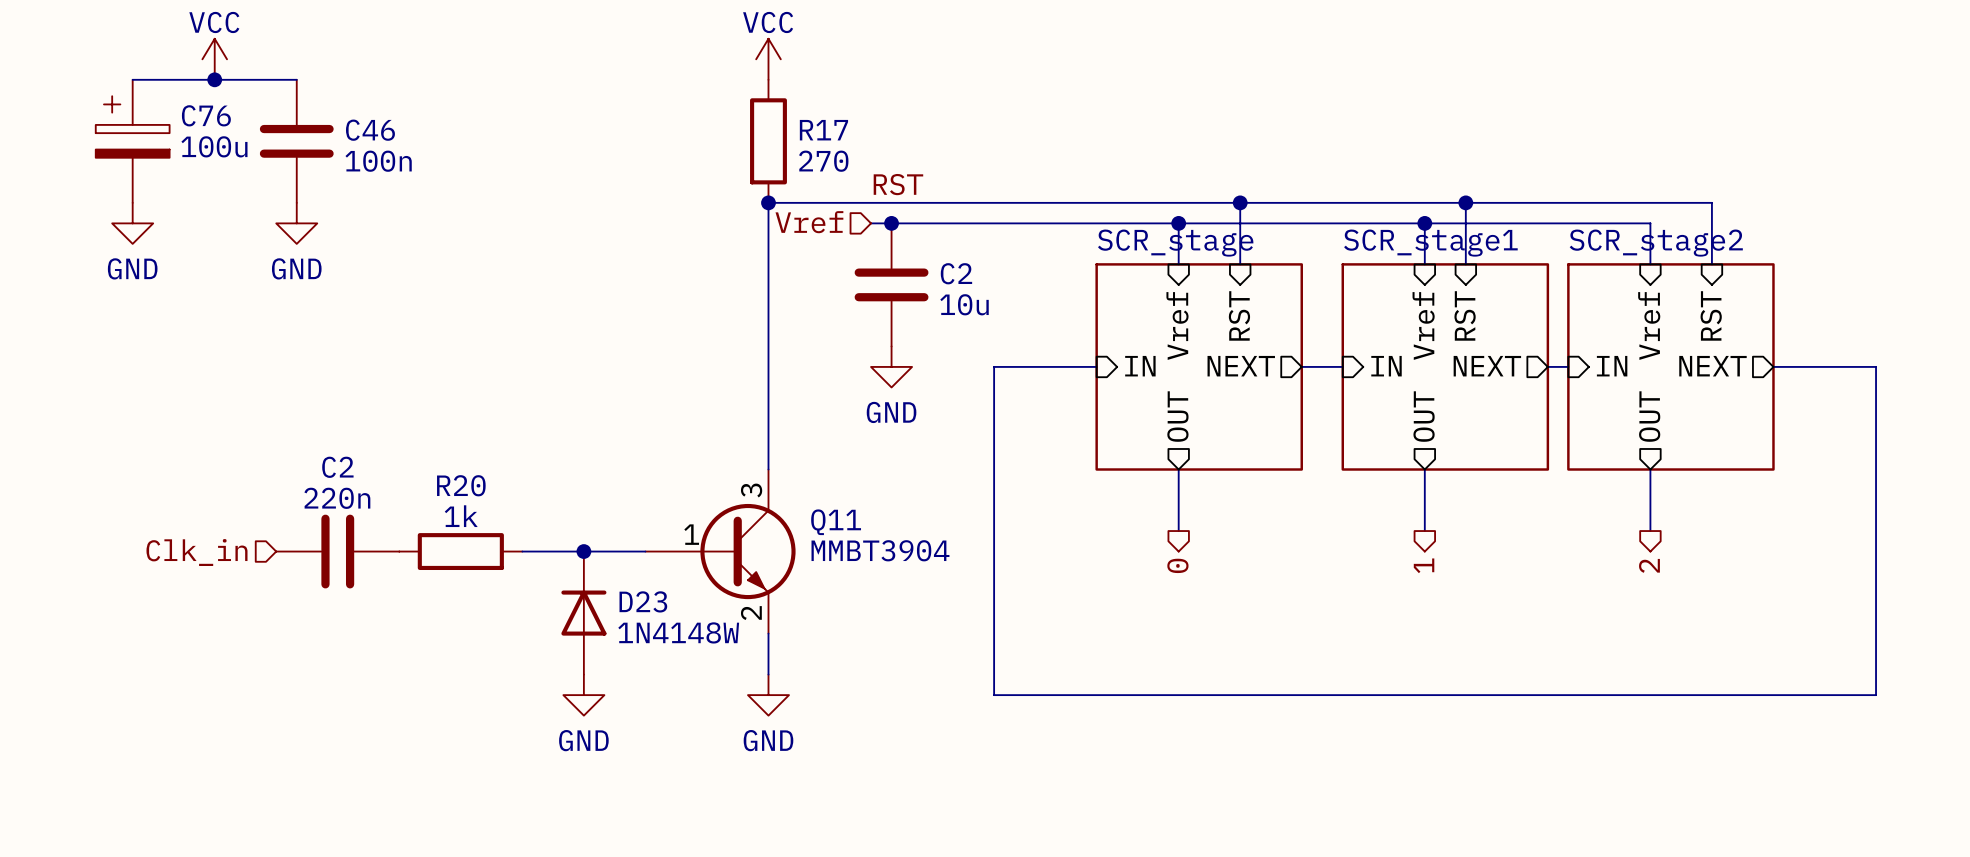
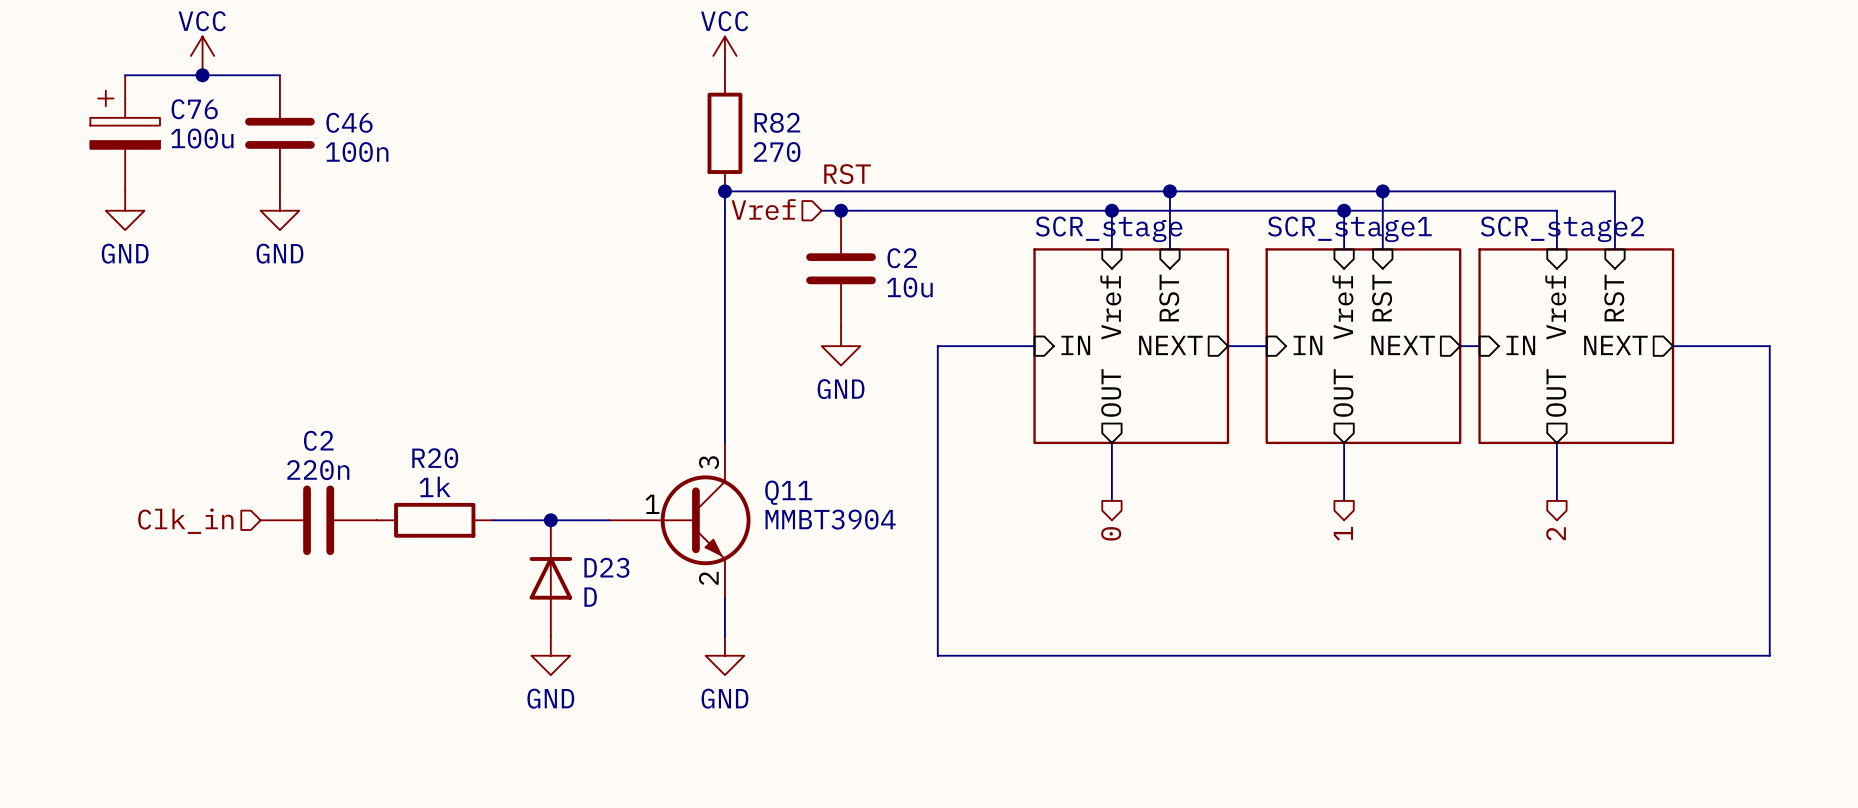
R17 name: R17 (823, 130) -> R82 (777, 122)
D23 value: 1N4148W (678, 632) -> D (590, 597)

